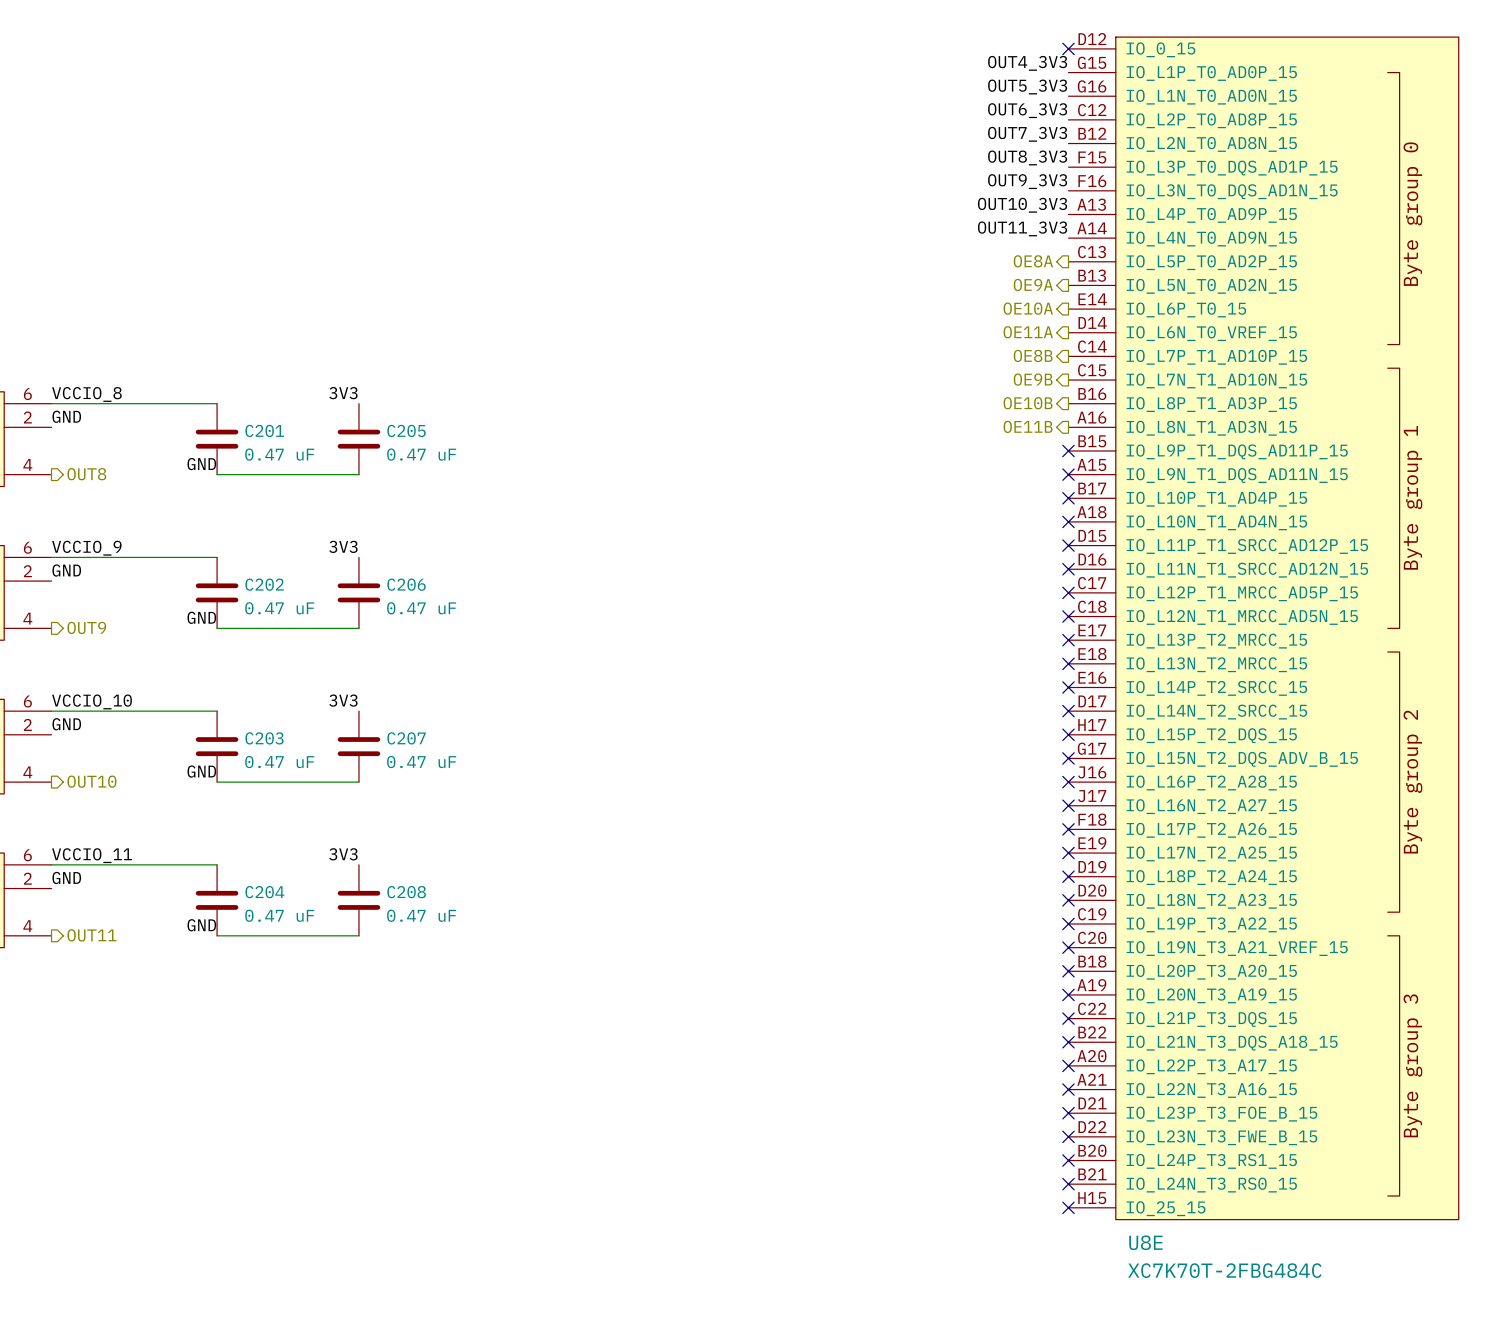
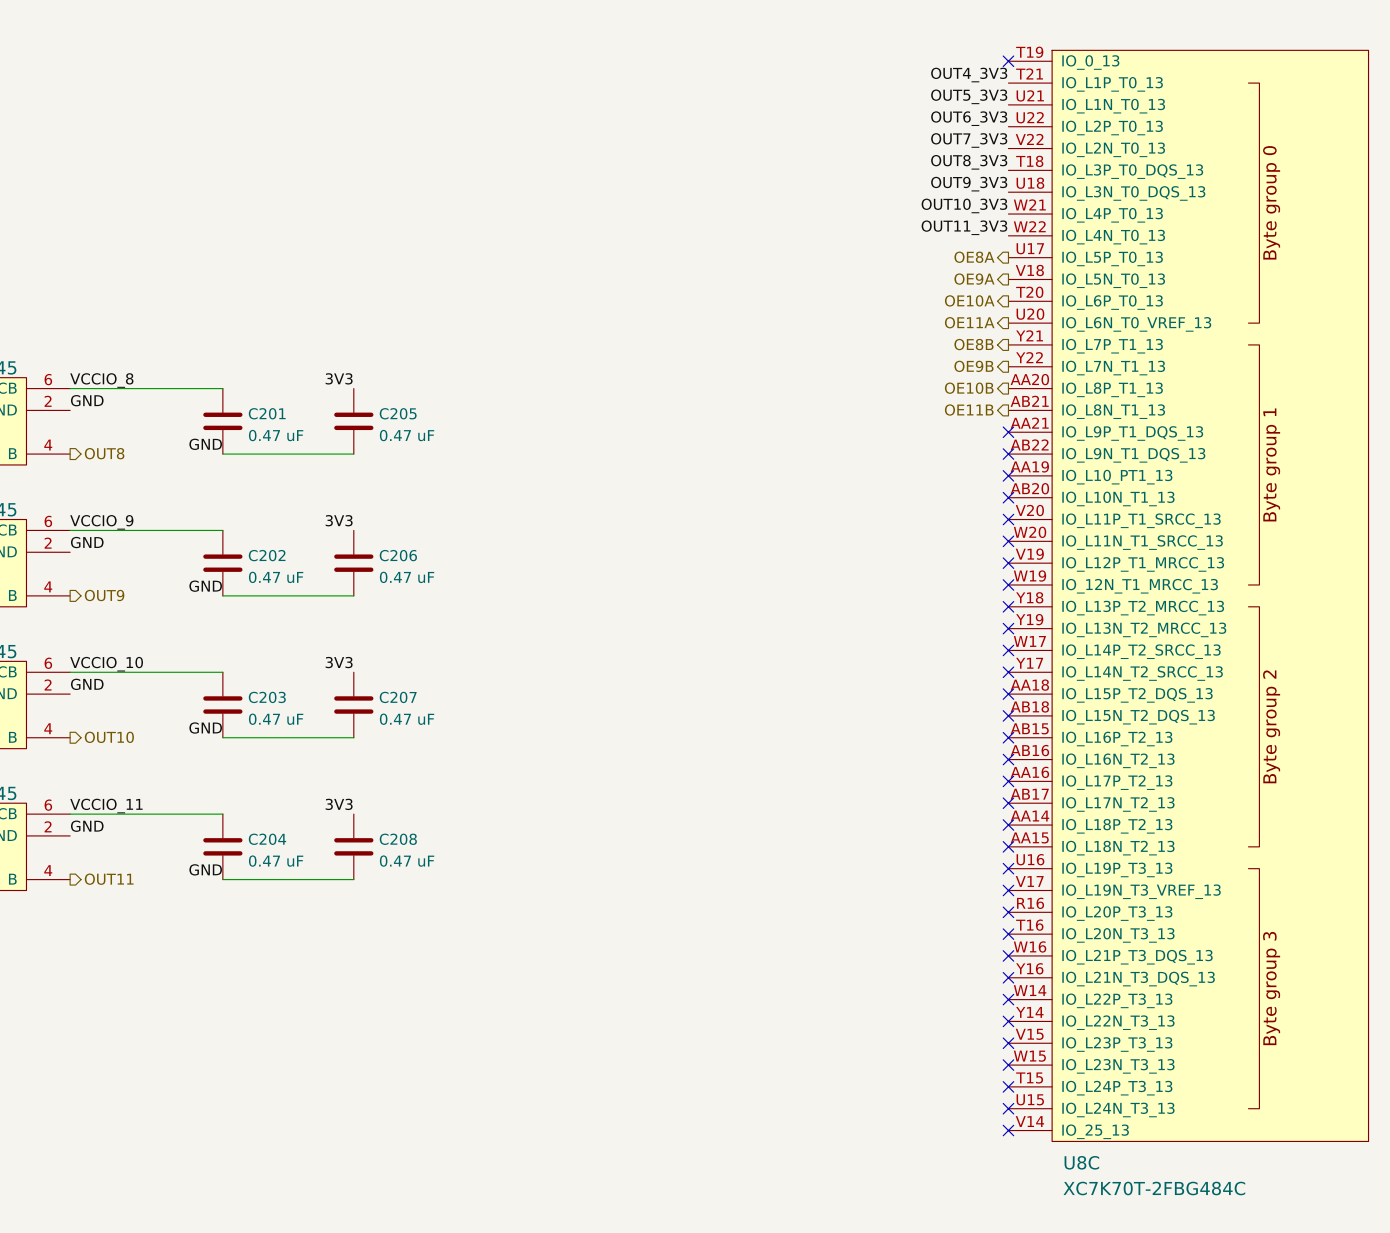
U8E: XC7K70T-2FBG484C (1263, 628) -> none
U8C: none -> XC7K70T-2FBG484C (1188, 595)

